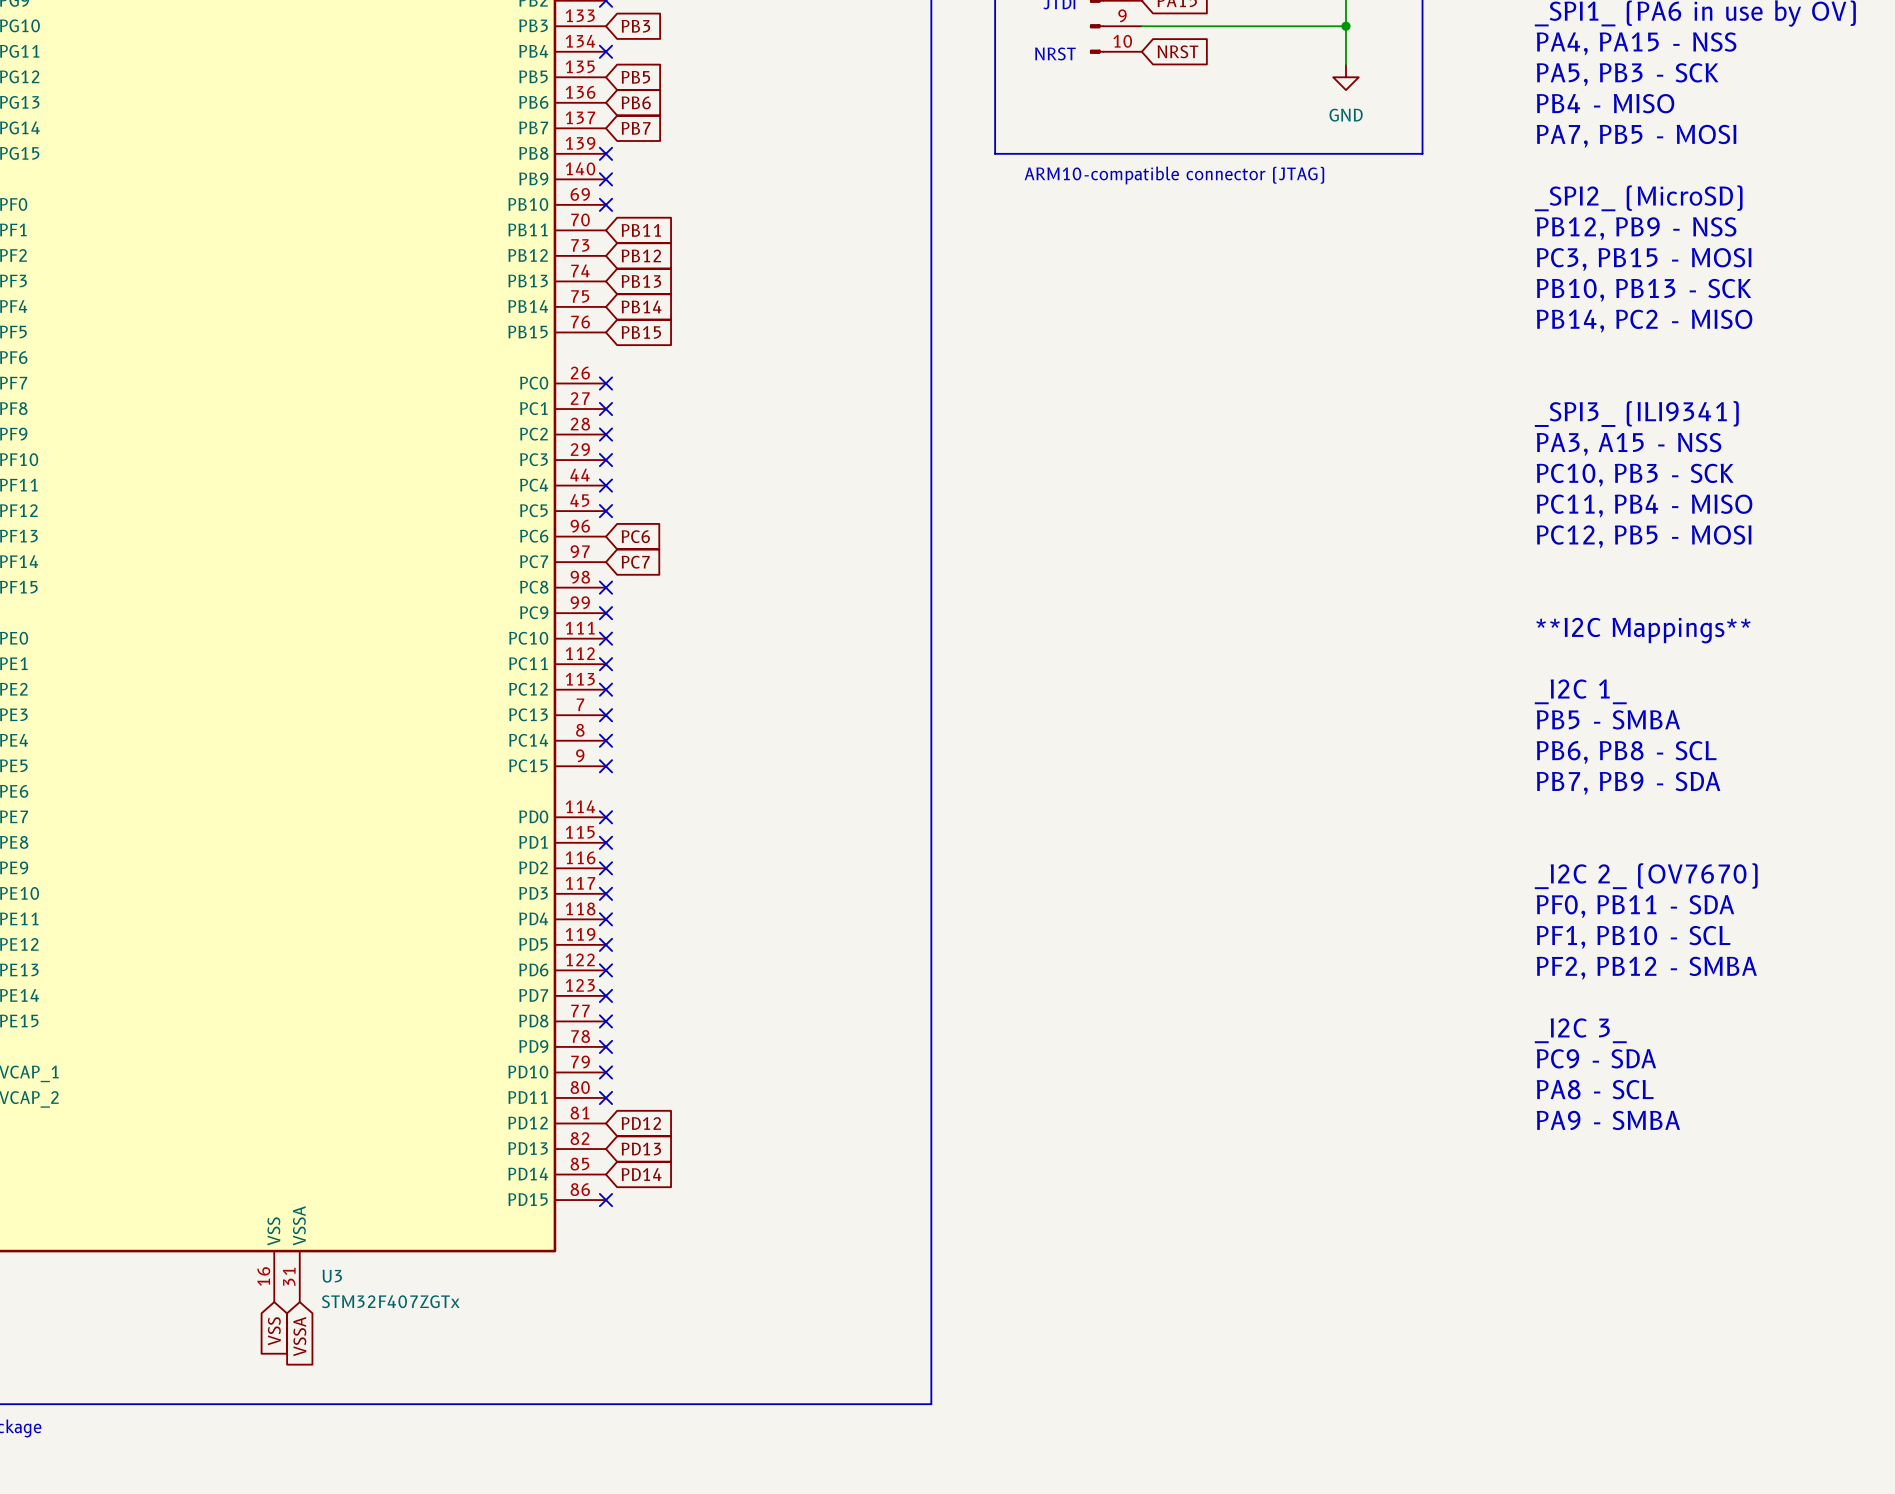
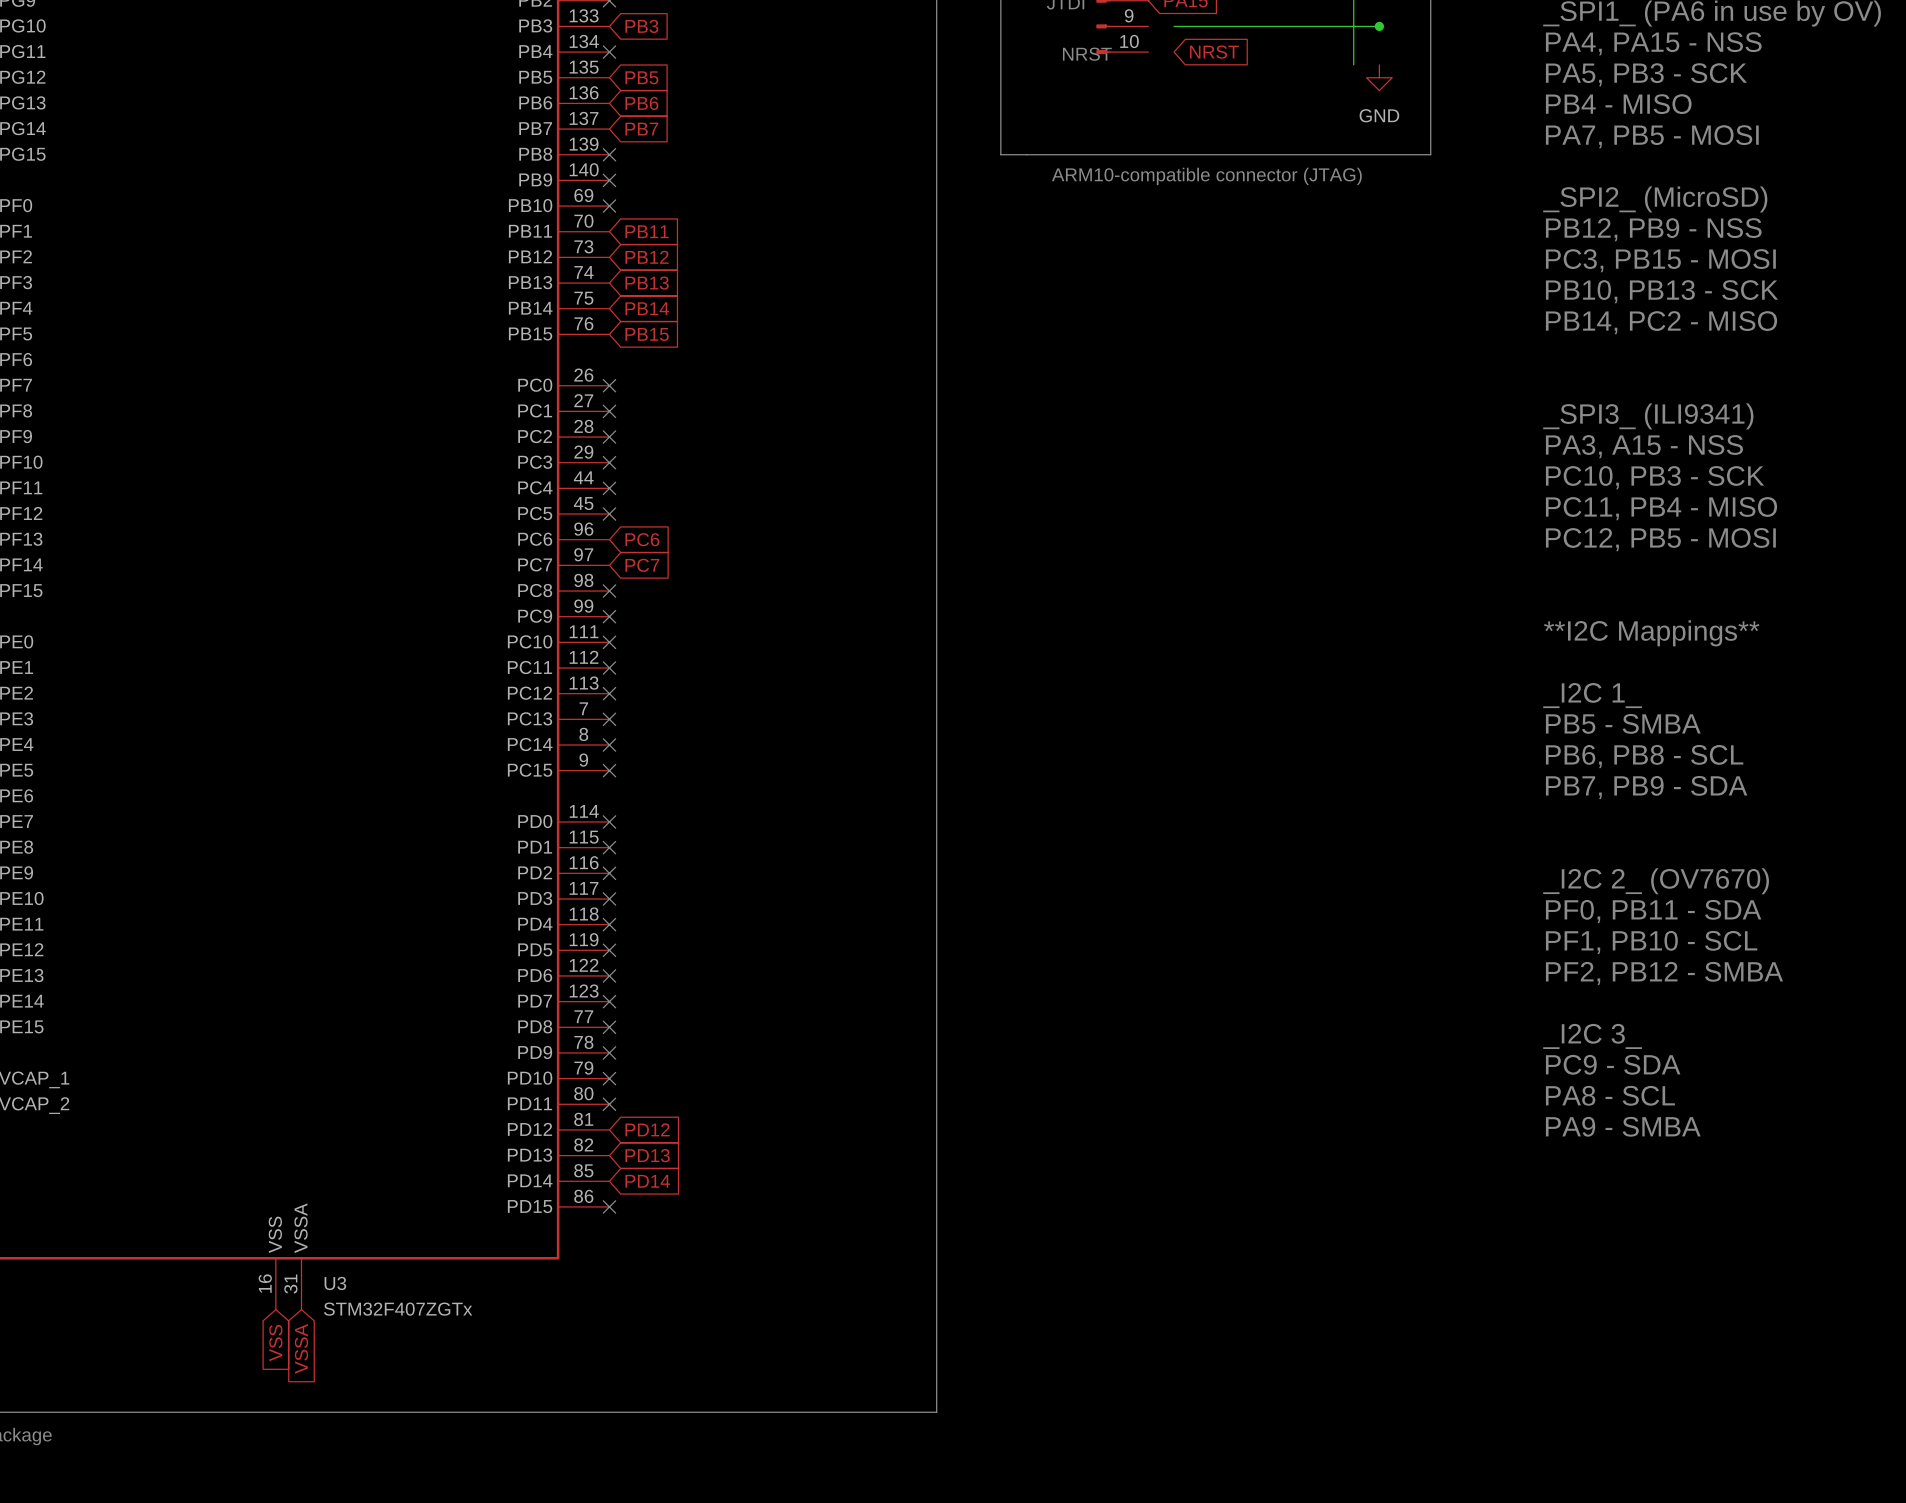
wire: (1141, 26) (1167, 26) -> (1353, 26) (1379, 26)
junction position: (1345, 26) -> (1379, 26)
global label position: NRST (1177, 51) -> NRST (1214, 52)
text position: NRST (1055, 53) -> NRST (1087, 54)
power symbol position: GND (1345, 77) -> GND (1379, 77)
text position: ARM10-compatible connector (JTAG) (1174, 175) -> ARM10-compatible connector (JTAG) (1206, 176)

